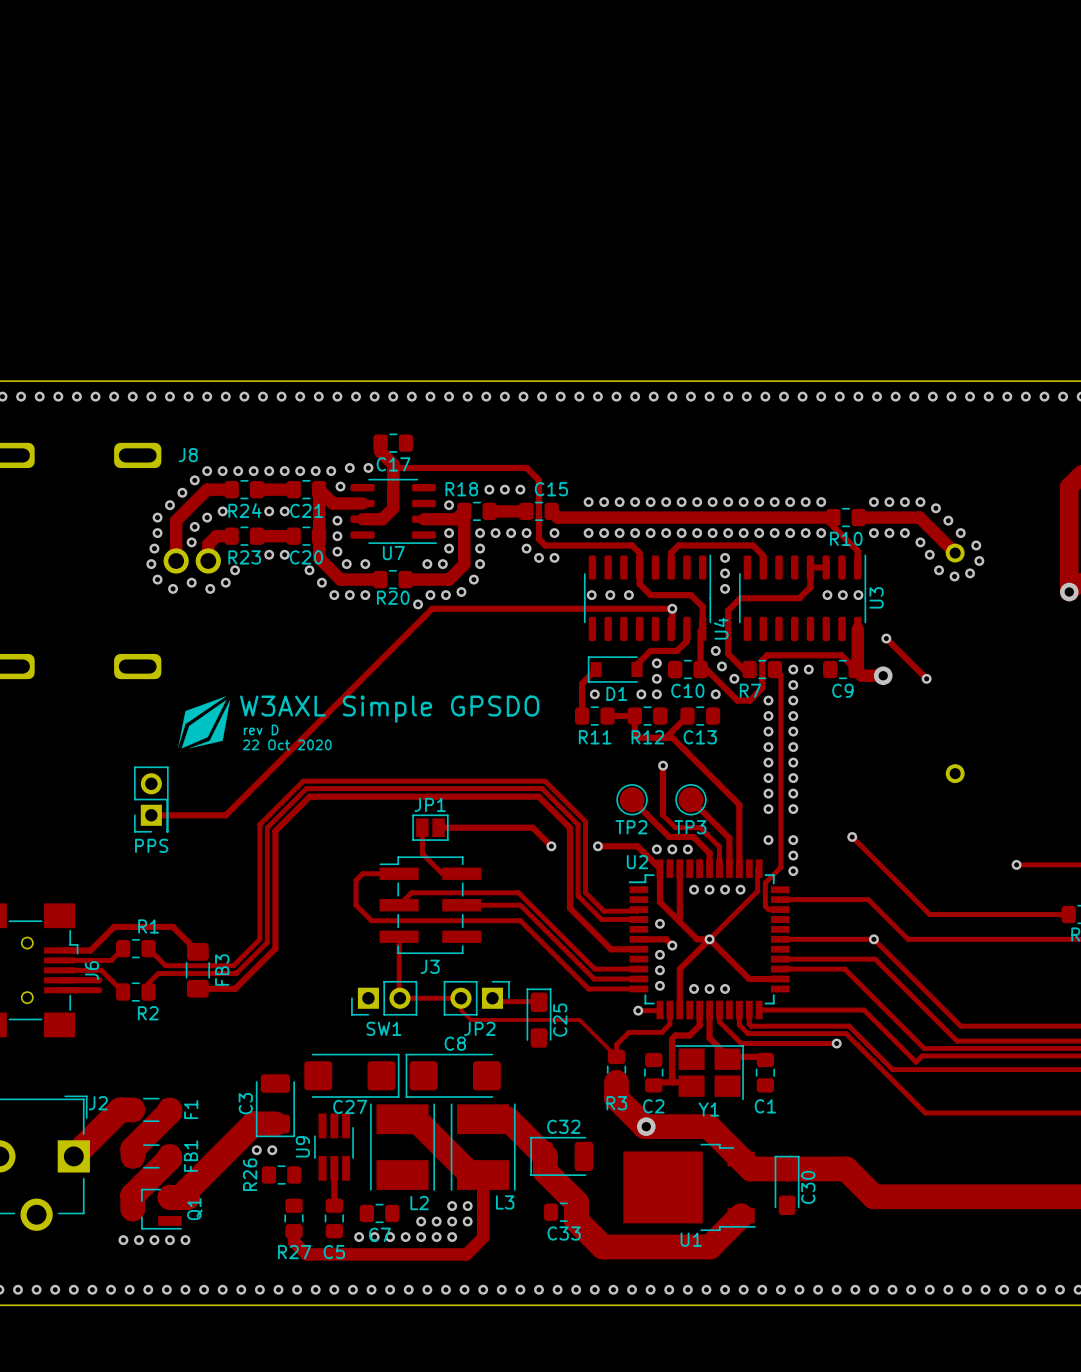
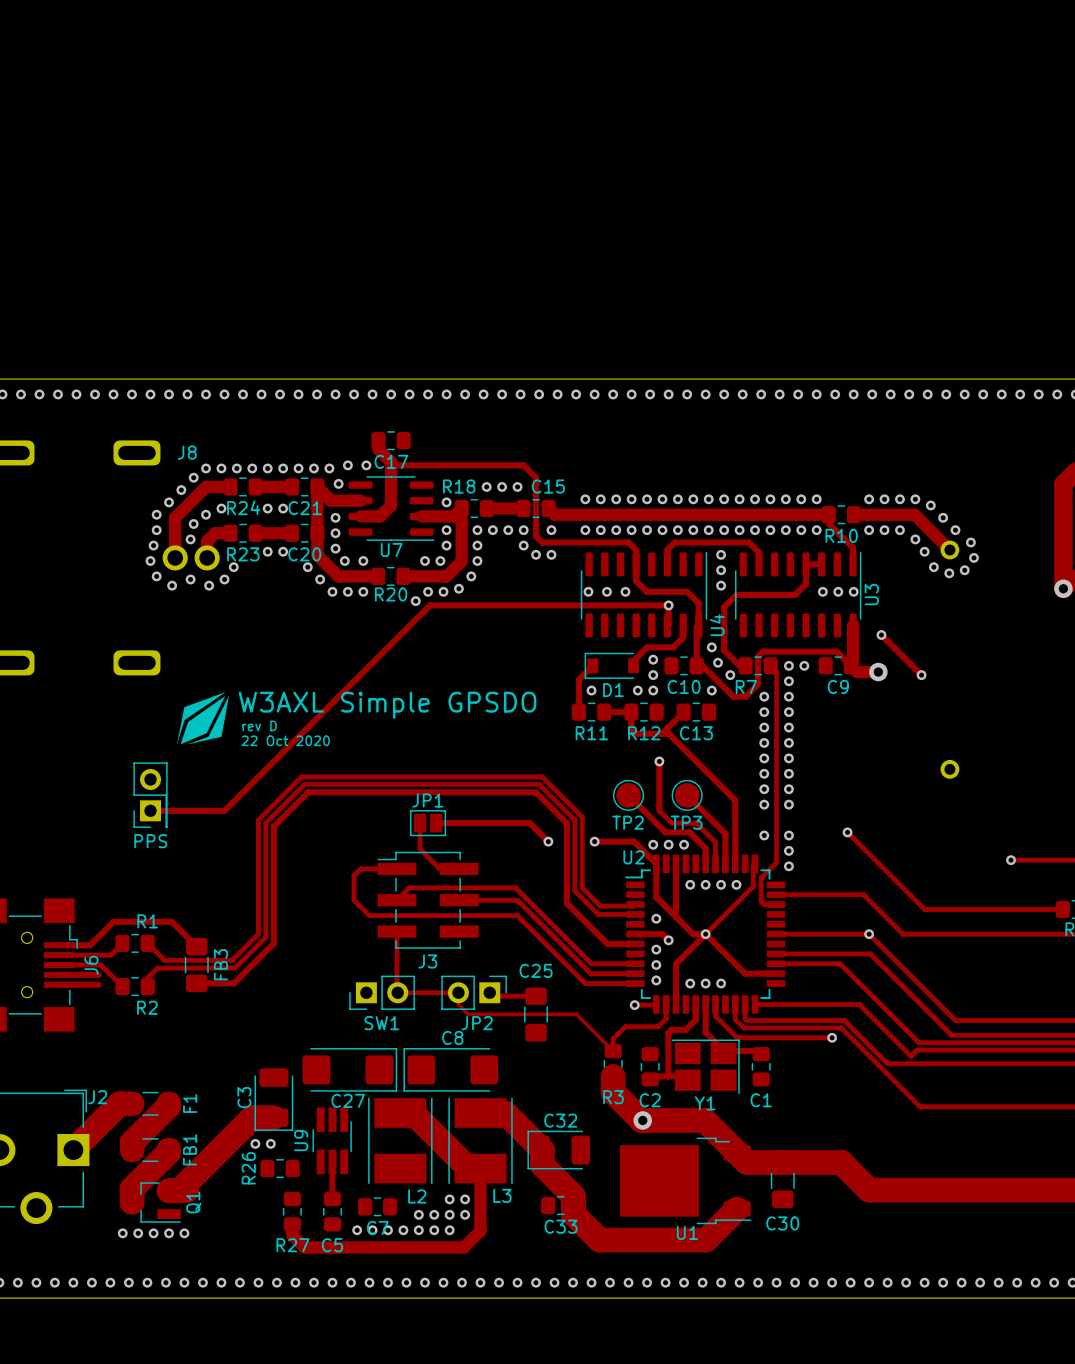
C25 footprint: [526, 988, 552, 1048] -> [524, 987, 549, 1042]
C25 name position: C25 (560, 1020) -> C25 (536, 970)
C30 footprint: [774, 1155, 800, 1216] -> [770, 1153, 795, 1209]
C30 name position: C30 (808, 1187) -> C30 (782, 1223)

